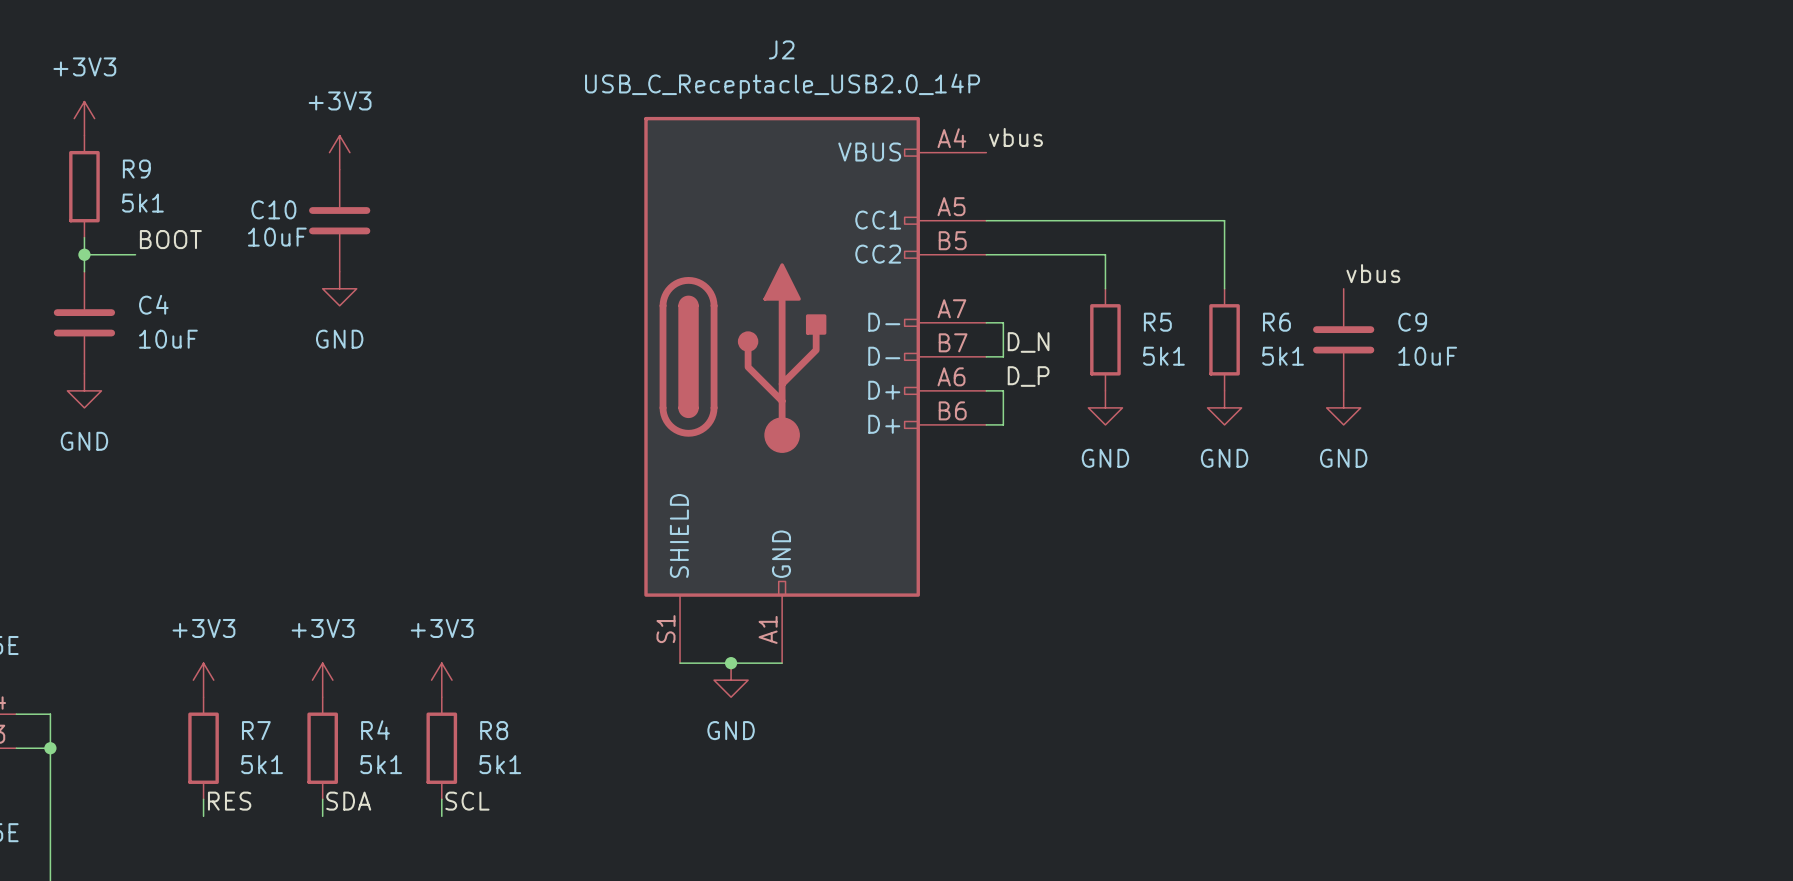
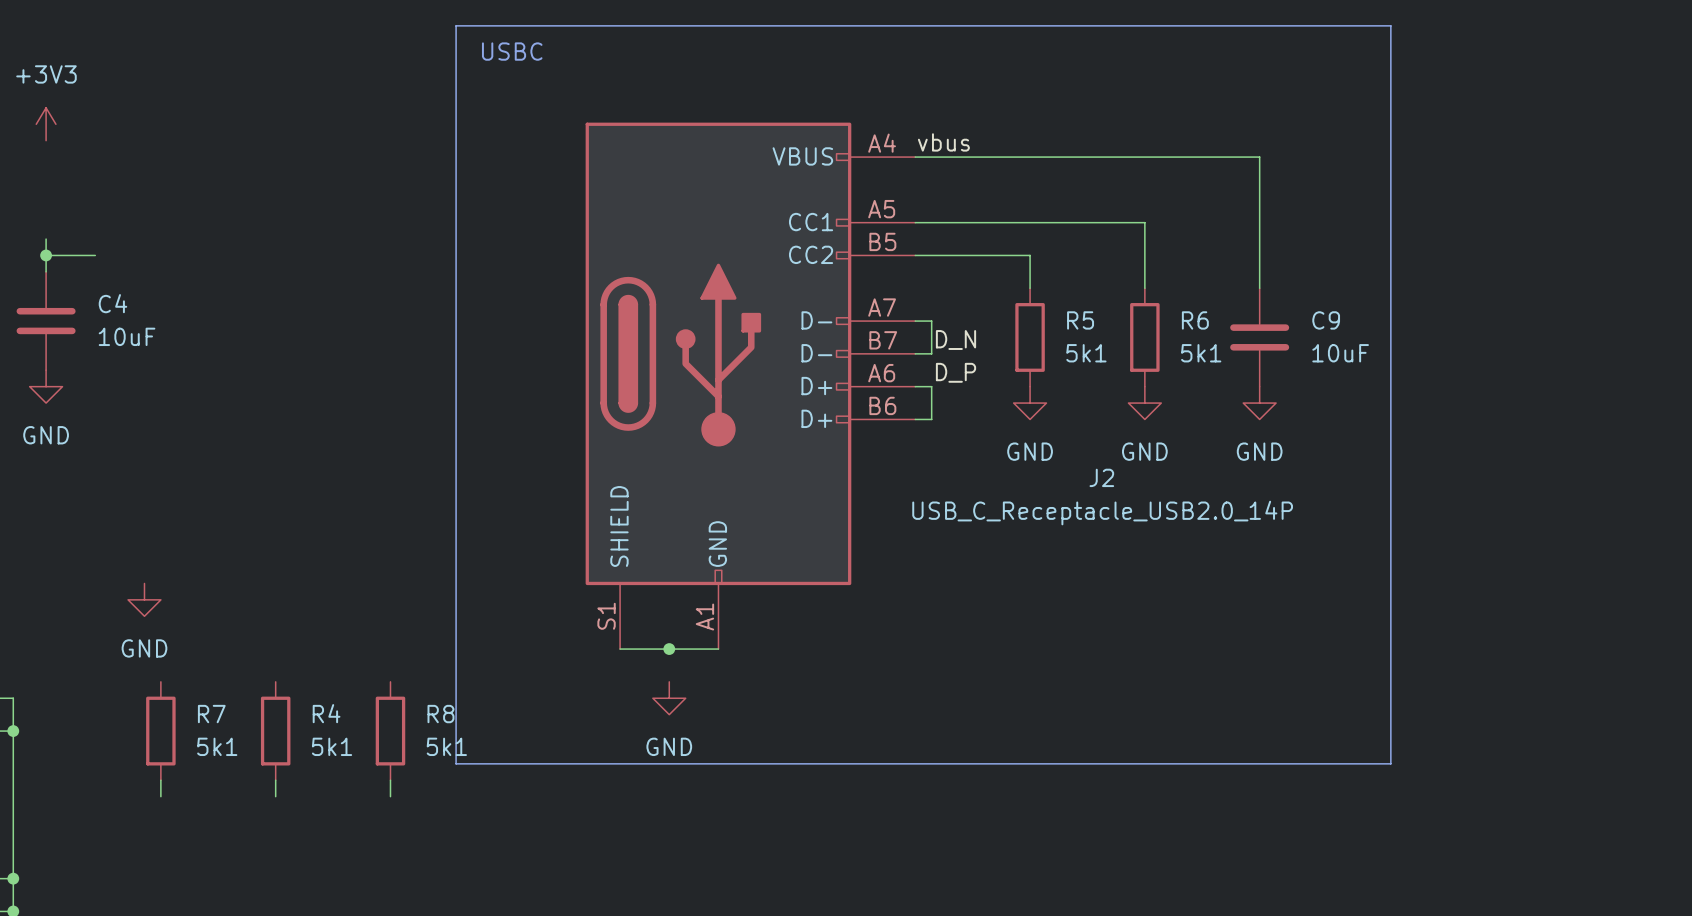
line: none -> (456, 25) (1390, 25) (1390, 763) (456, 763) (456, 25)
text: none -> USBC (512, 51)
J2 name position: J2 (781, 49) -> J2 (1101, 477)
J2 value position: USB_C_Receptacle_USB2.0_14P (782, 86) -> USB_C_Receptacle_USB2.0_14P (1102, 513)
power symbol: +3V3 (339, 152) -> none
wire: none -> (915, 157) (1259, 157) (1259, 288)
R9: 5k1 (84, 186) -> none
C10: 10uF (339, 220) -> none
label: BOOT (170, 239) -> none
label: vbus (1373, 273) -> none
power symbol: GND (339, 288) -> none
power symbol: none -> GND (144, 599)
power symbol: +3V3 (203, 680) -> none
power symbol: +3V3 (322, 680) -> none
power symbol: +3V3 (441, 680) -> none
power symbol position: GND (731, 680) -> GND (669, 698)
label: RES (229, 801) -> none
label: SDA (348, 801) -> none
label: SCL (467, 801) -> none

